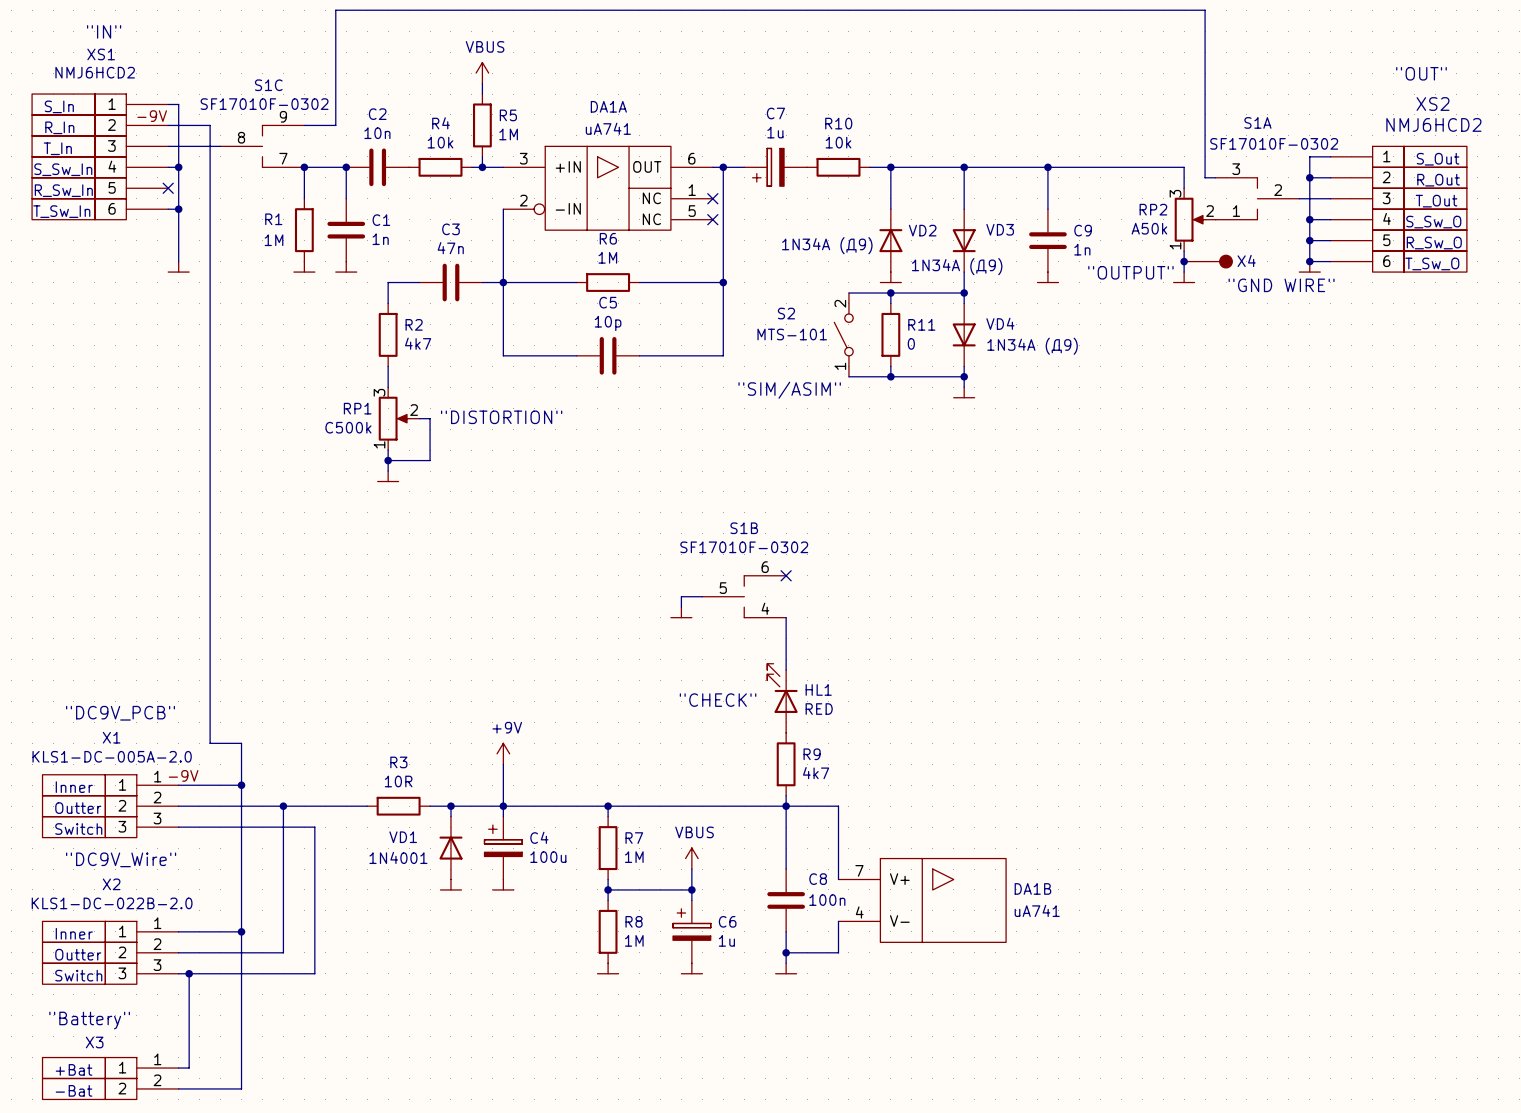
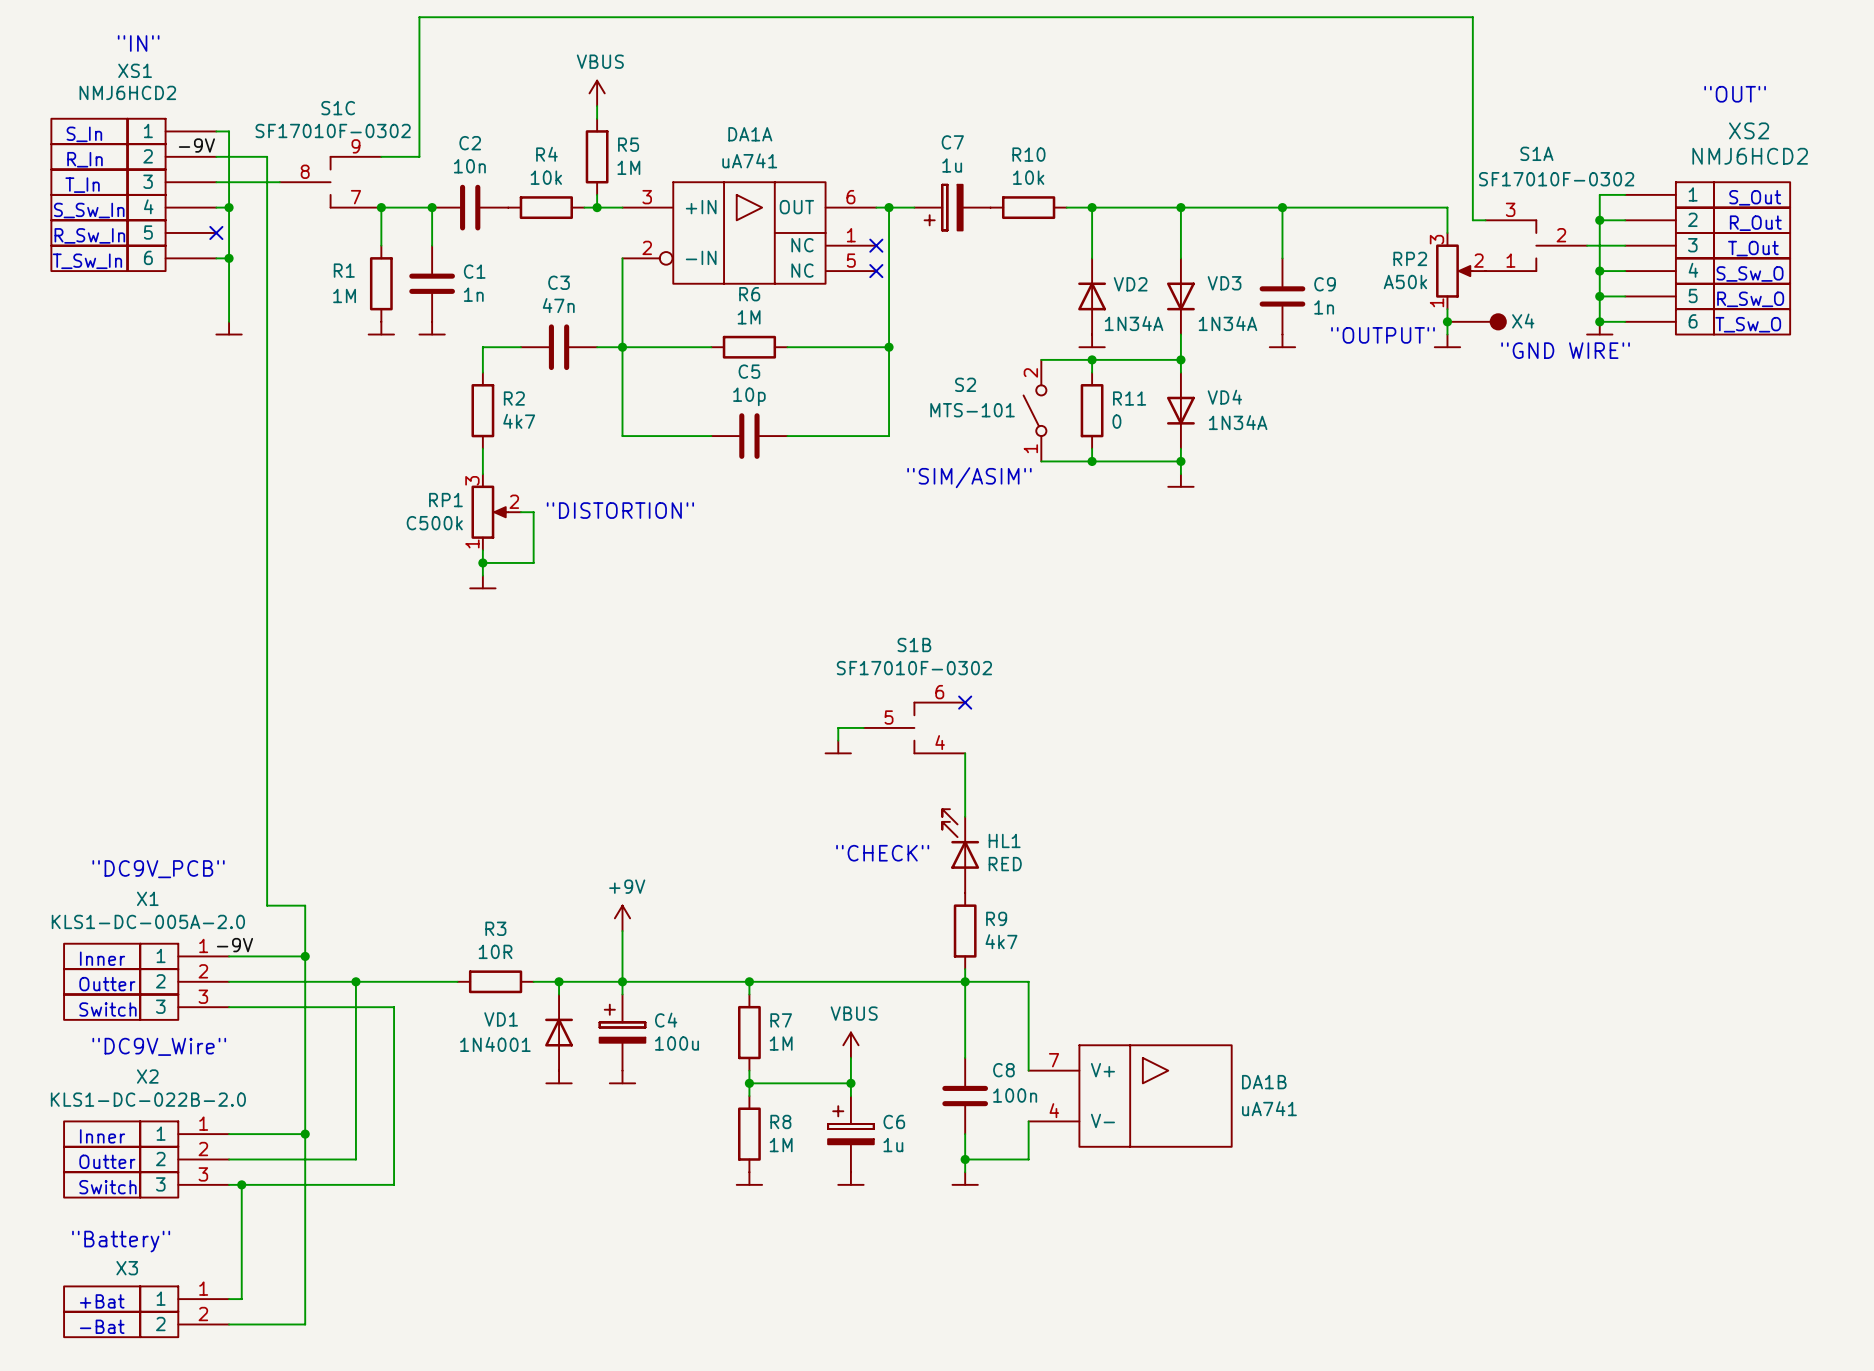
VD2 value: 1N34A (Д9) (827, 245) -> 1N34A (1134, 323)
VD3 value: 1N34A (Д9) (957, 266) -> 1N34A (1227, 323)
VD4 value: 1N34A (Д9) (1032, 346) -> 1N34A (1238, 422)

